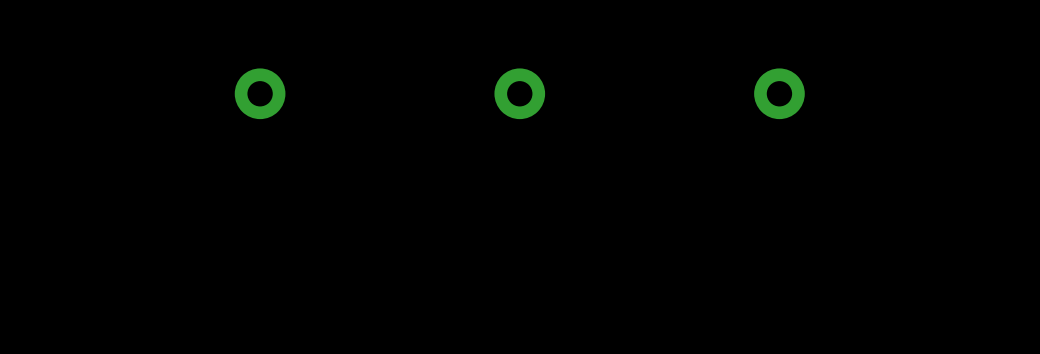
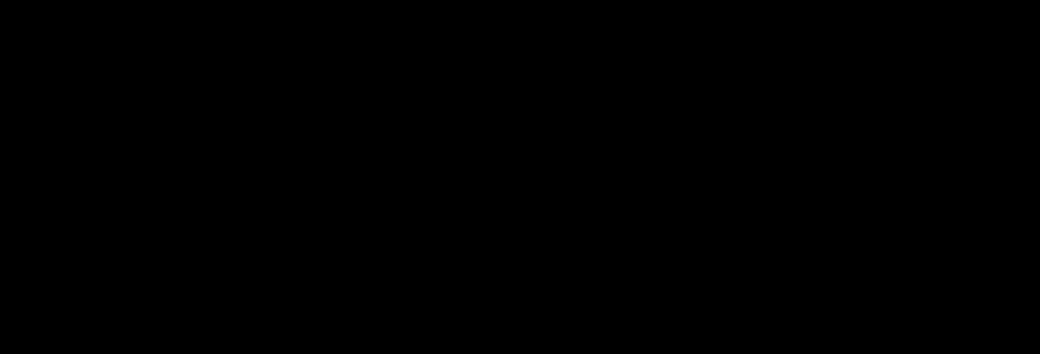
via: (260, 93) -> none
via: (519, 93) -> none
via: (779, 93) -> none

